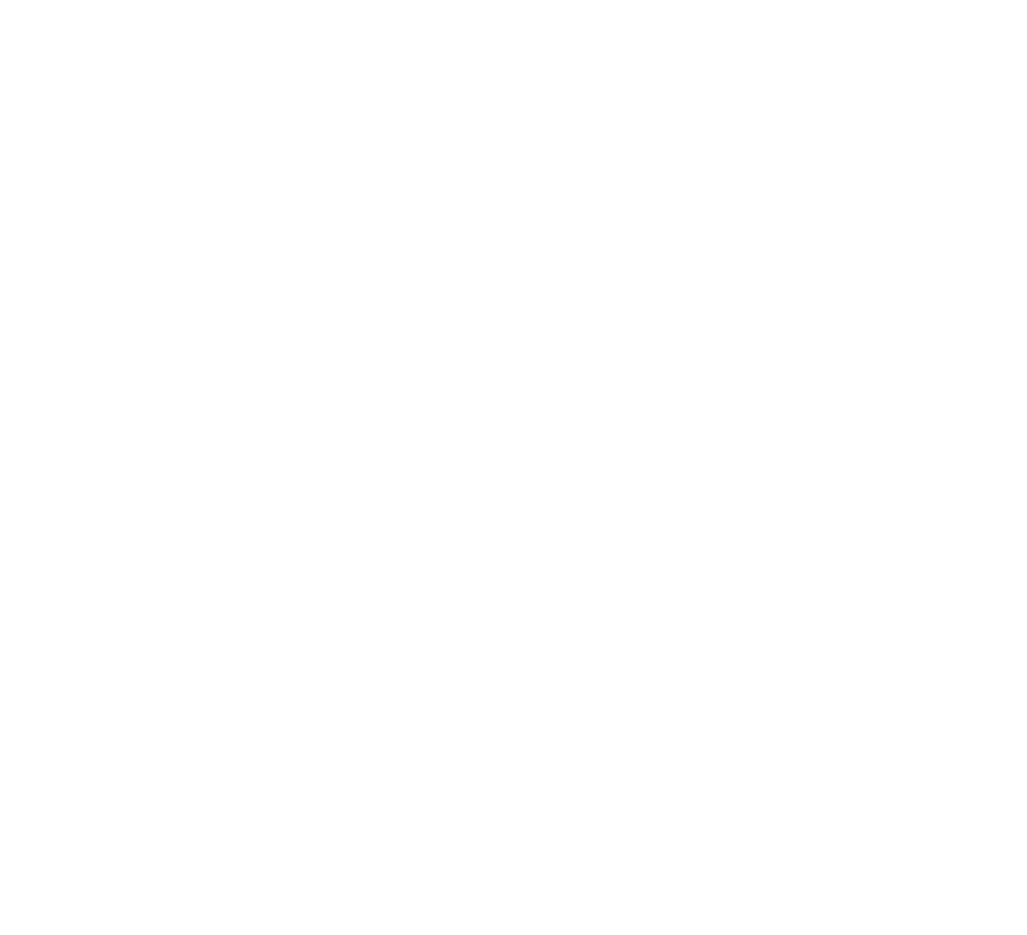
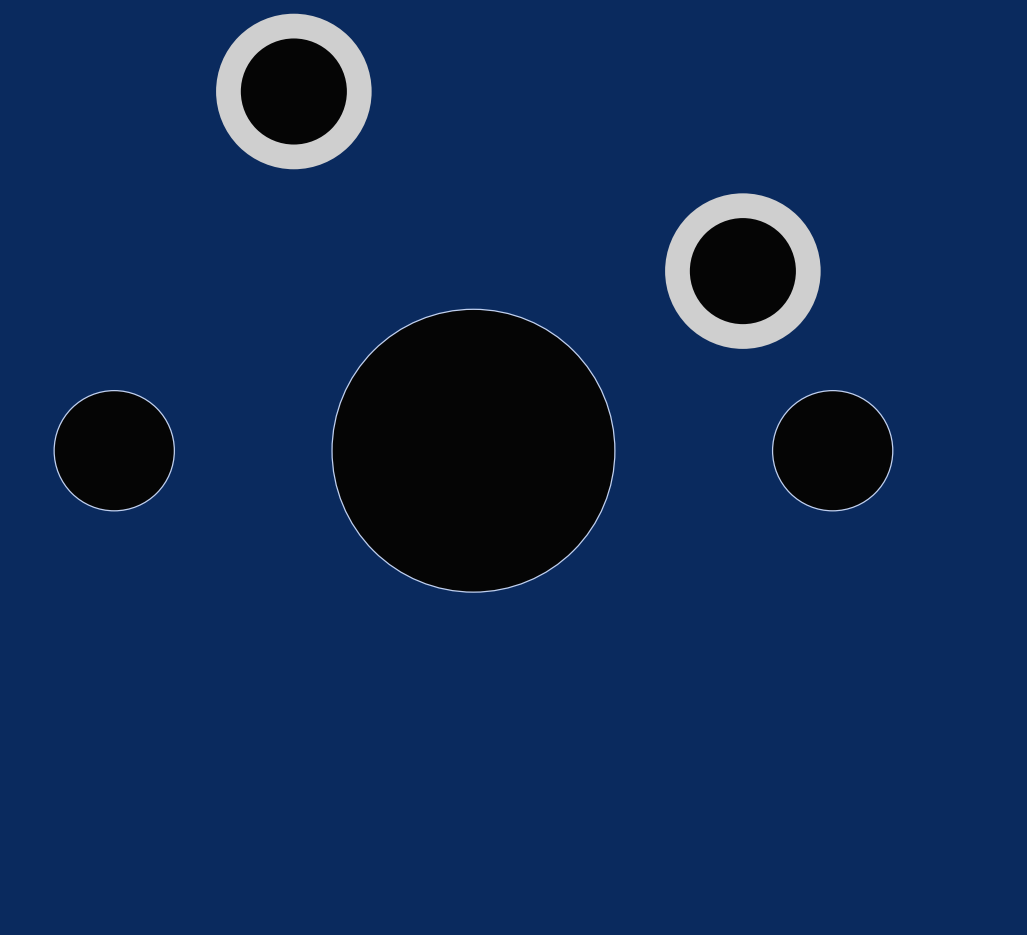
part: none -> (473, 302)

